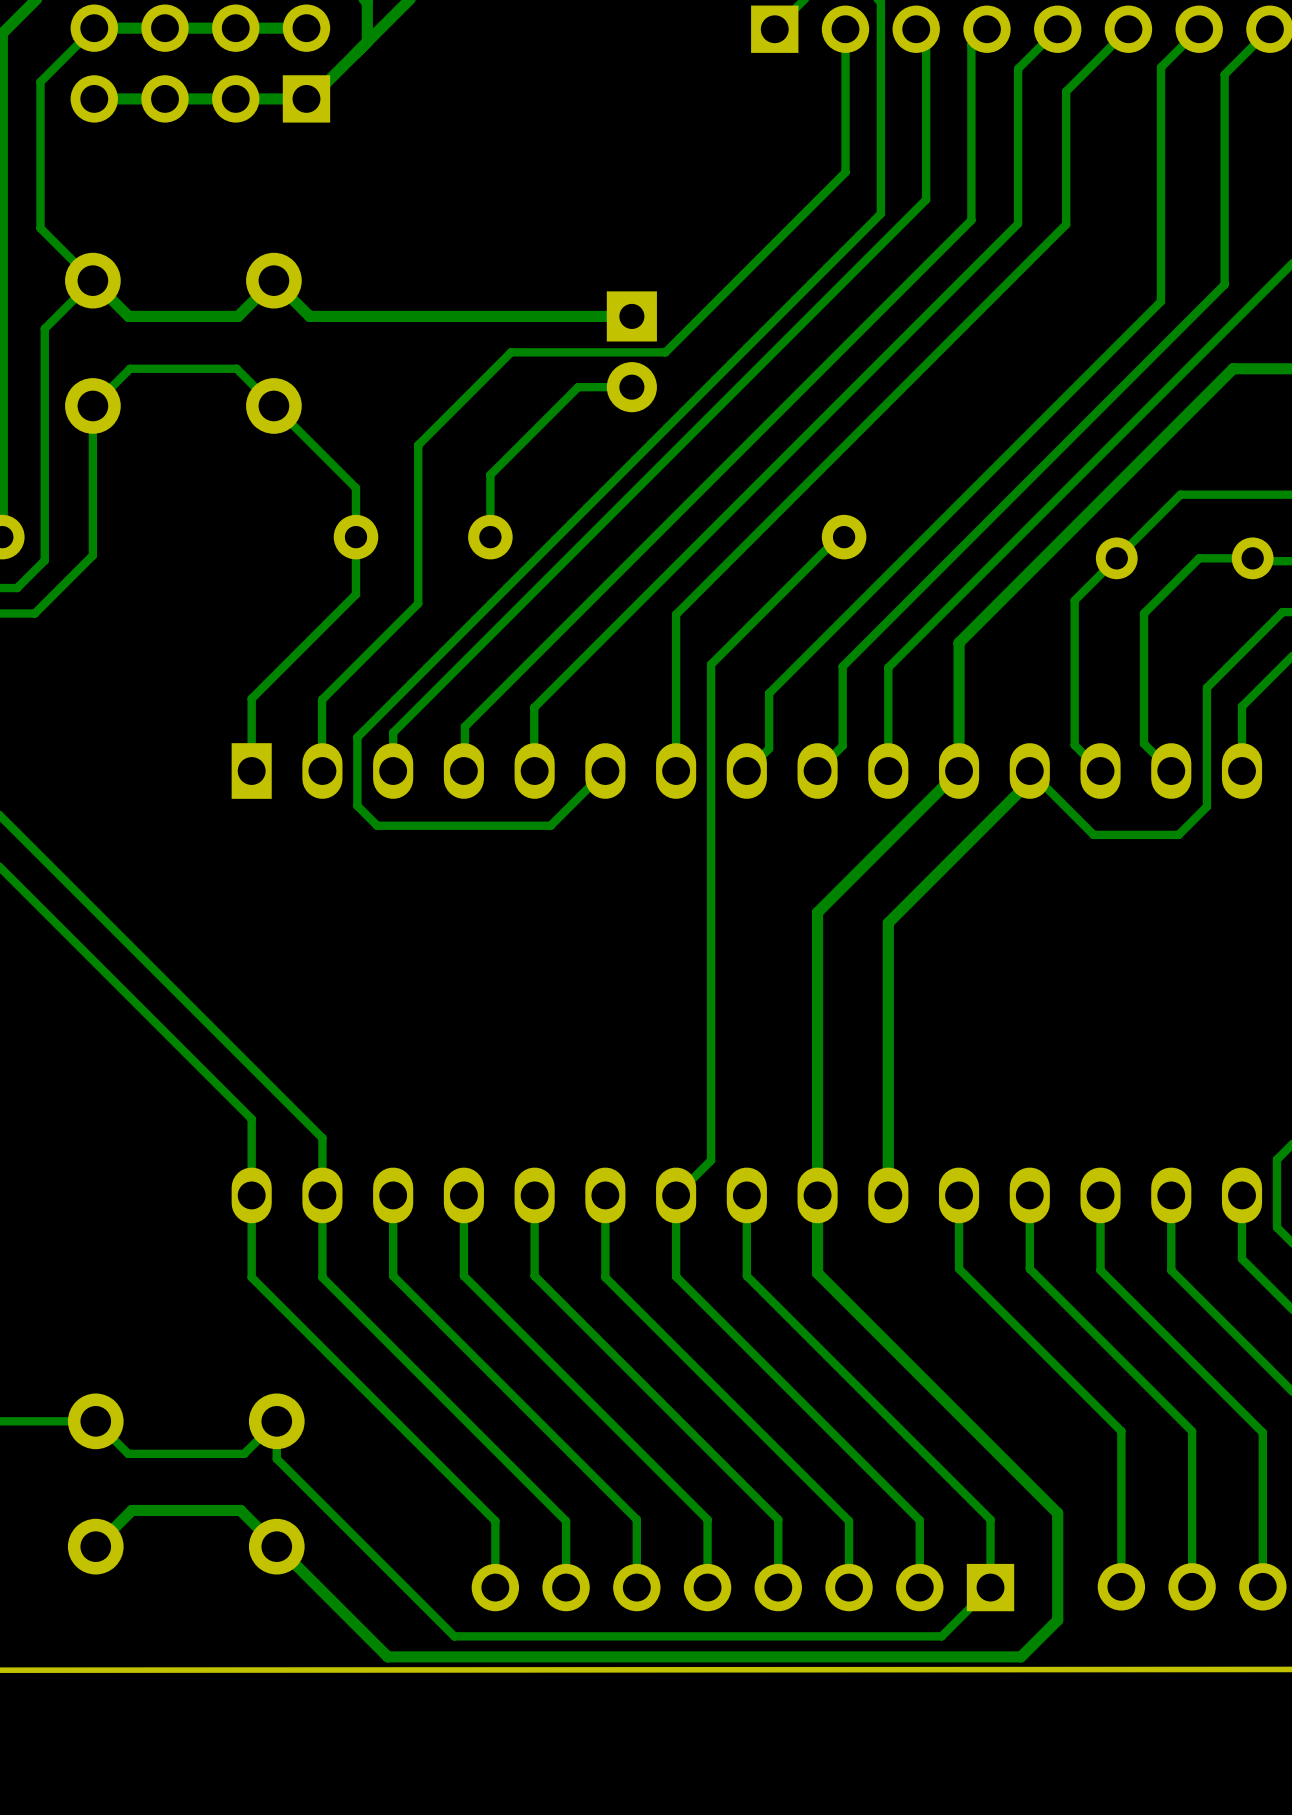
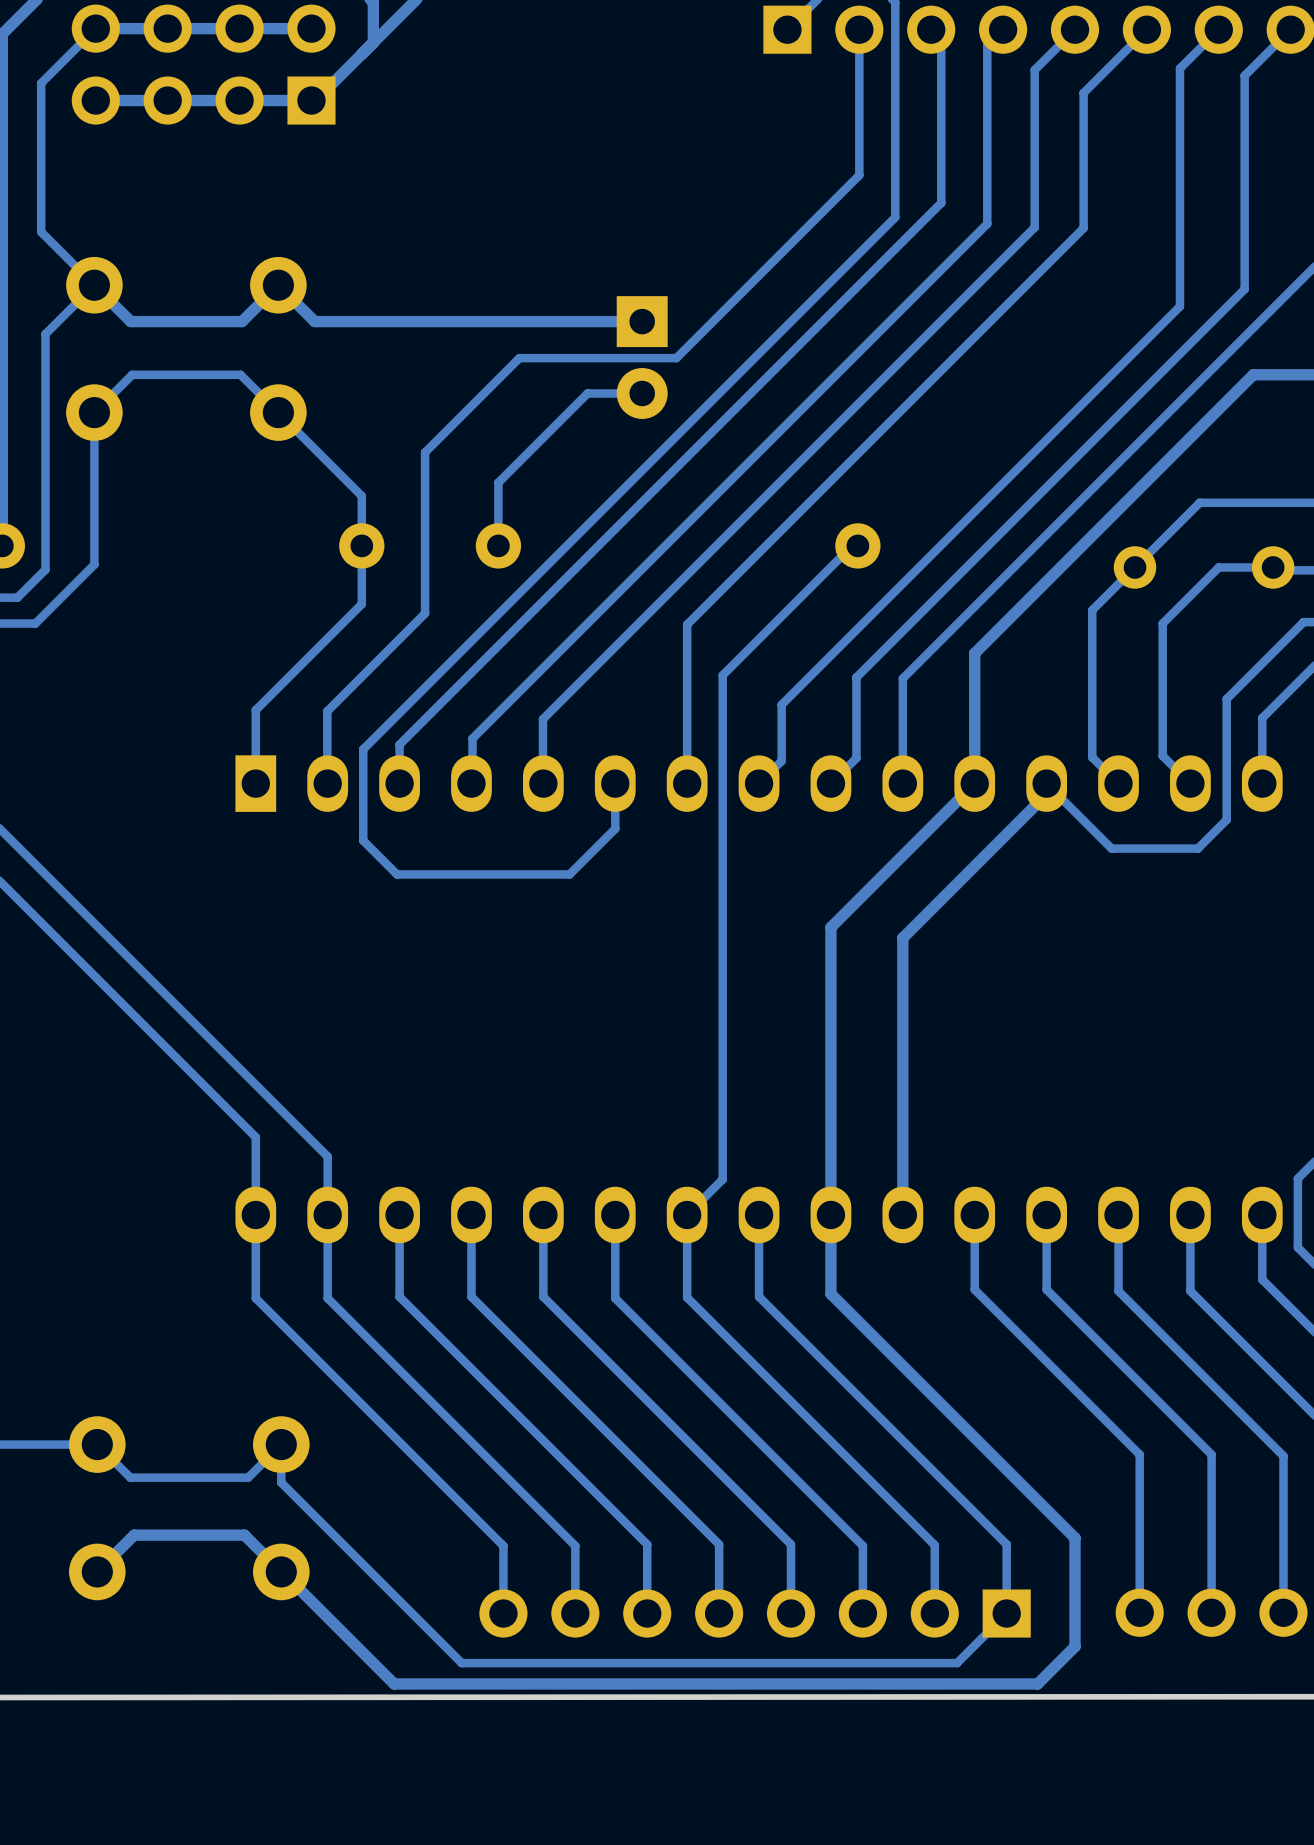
track: (605, 771) (550, 825) (377, 825) (357, 805) -> (615, 783) (615, 828) (569, 874) (397, 874) (363, 840) (363, 819)

